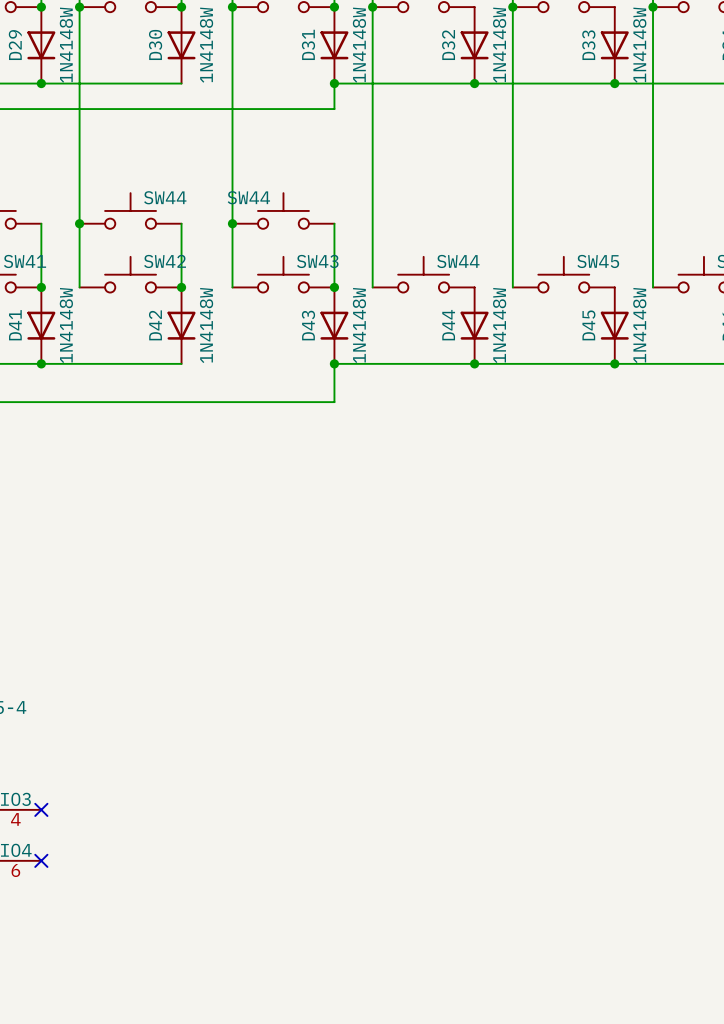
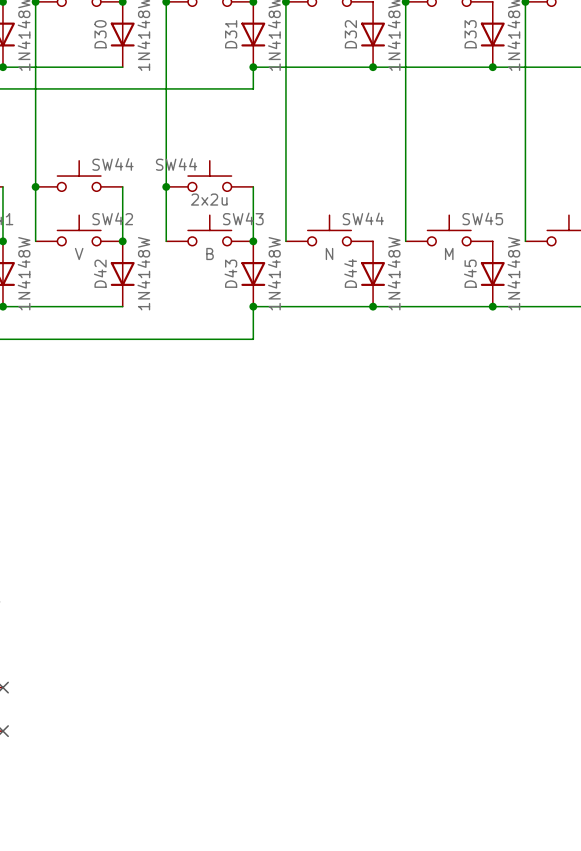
SW44 value: none -> 2x2u (209, 199)
SW42 value: none -> V (79, 253)
SW43 value: none -> B (210, 253)
SW44 value: none -> N (329, 253)
SW45 value: none -> M (449, 253)

